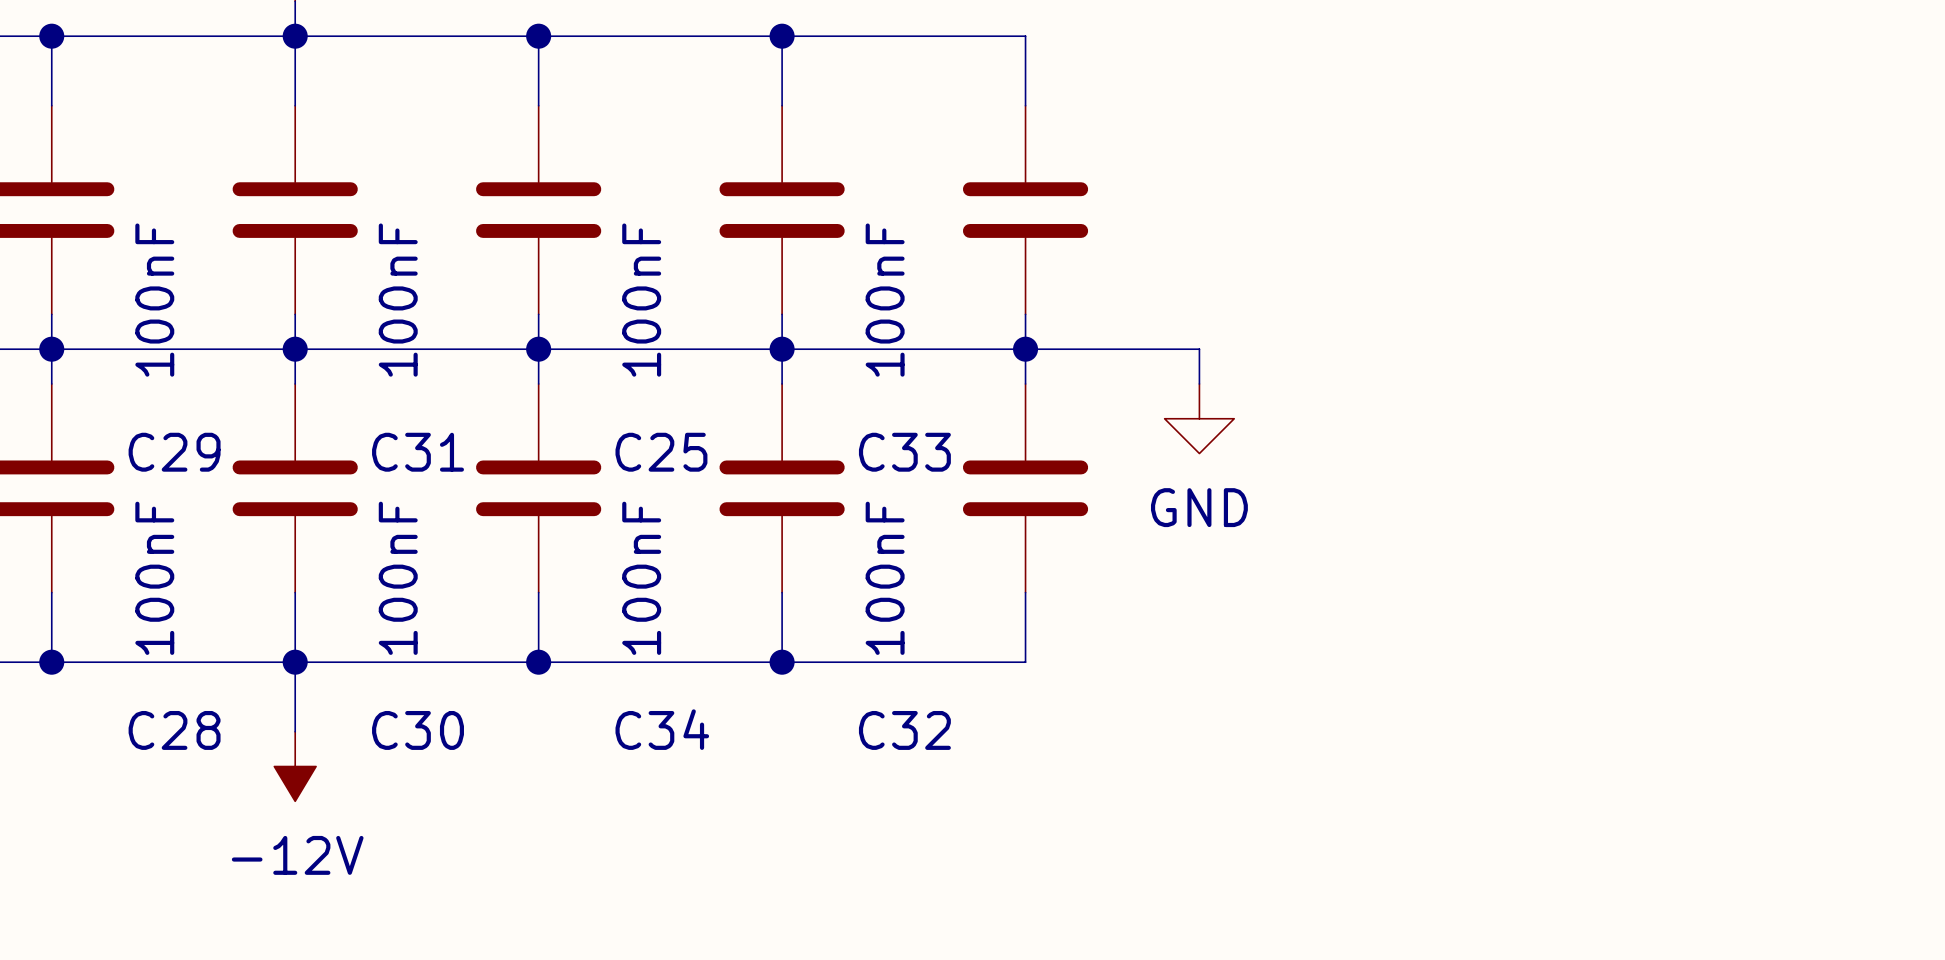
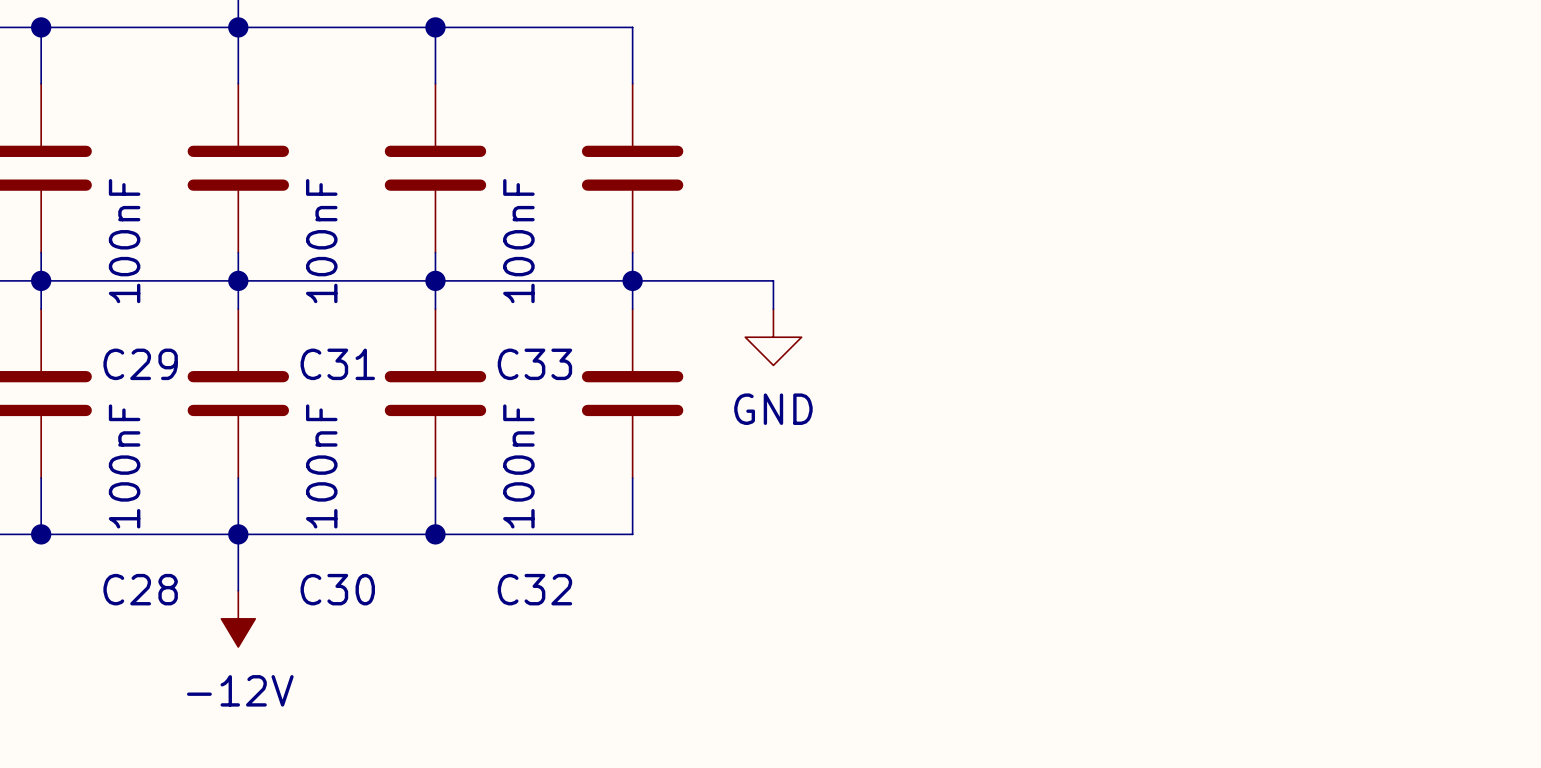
wire: (782, 36) (1025, 36) (1025, 105) -> none
junction: (782, 36) -> none
C33: 100nF (1025, 210) -> none
wire: (1025, 314) (1025, 383) -> none
wire: (955, 349) (1199, 349) (1199, 383) -> (773, 280) (773, 309)
junction: (1025, 349) -> none
power symbol position: GND (1199, 418) -> GND (773, 337)
C25 name: C25 (661, 452) -> C33 (534, 364)
C32: 100nF (1025, 488) -> none
wire: (1025, 592) (1025, 662) (782, 662) -> none
junction: (782, 662) -> none
C34 name: C34 (662, 729) -> C32 (534, 589)

